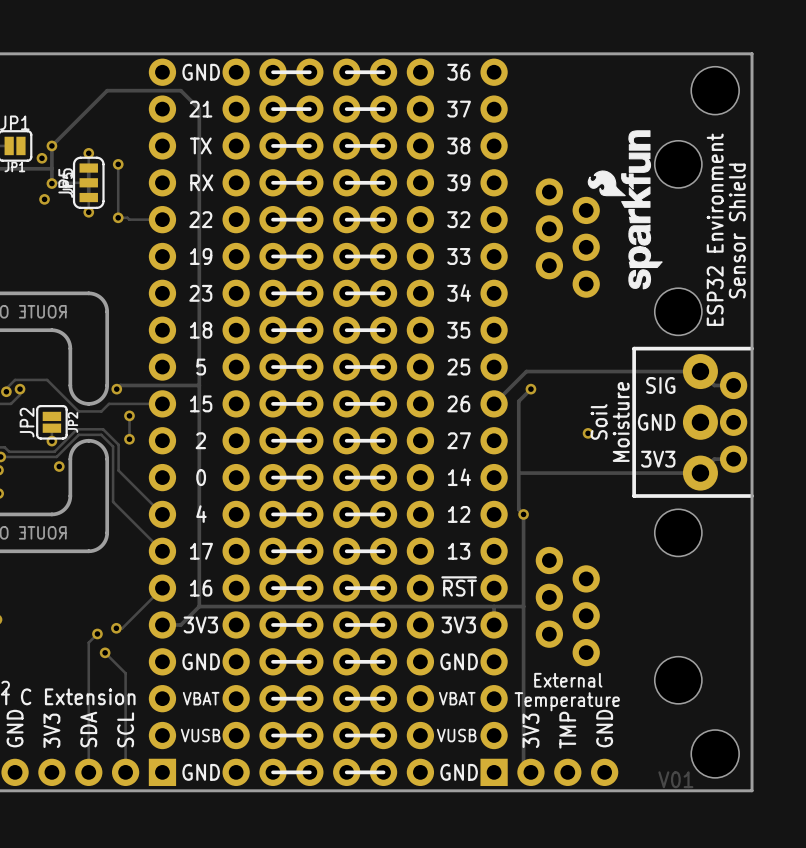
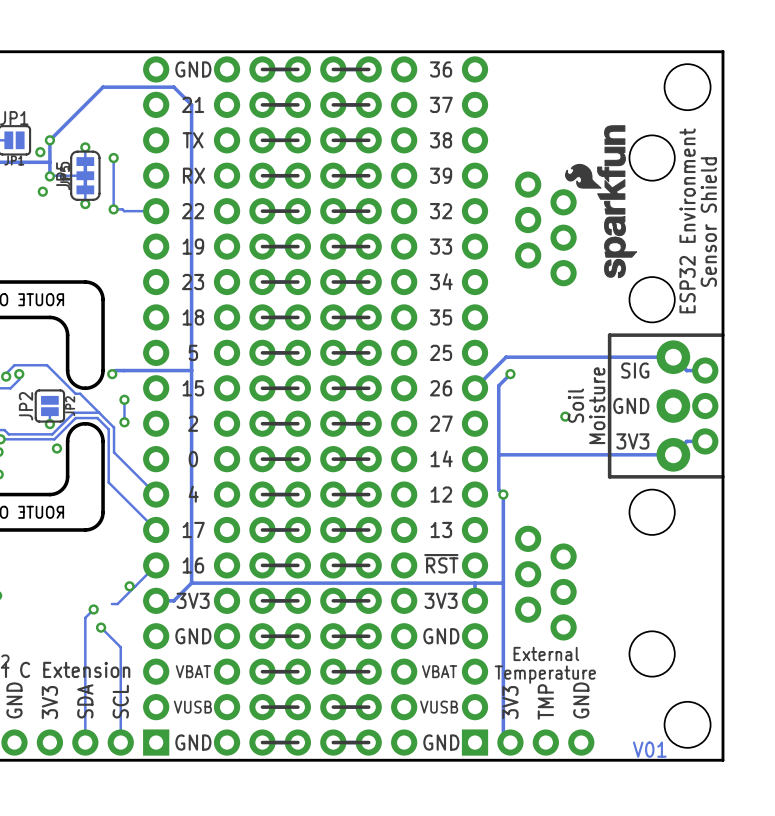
track: (47, 379) (78, 411) (101, 411) (109, 403) (162, 403) -> (45, 365) (75, 393) (80, 393) (99, 412)
via position: (116, 628) -> (129, 586)

